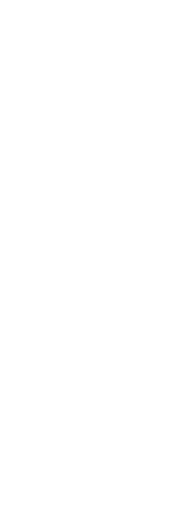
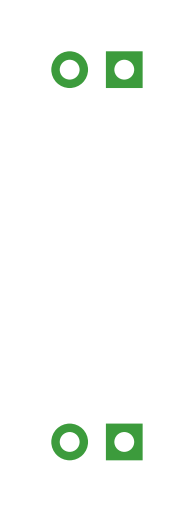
part: none -> (96, 69)
part: none -> (96, 441)

